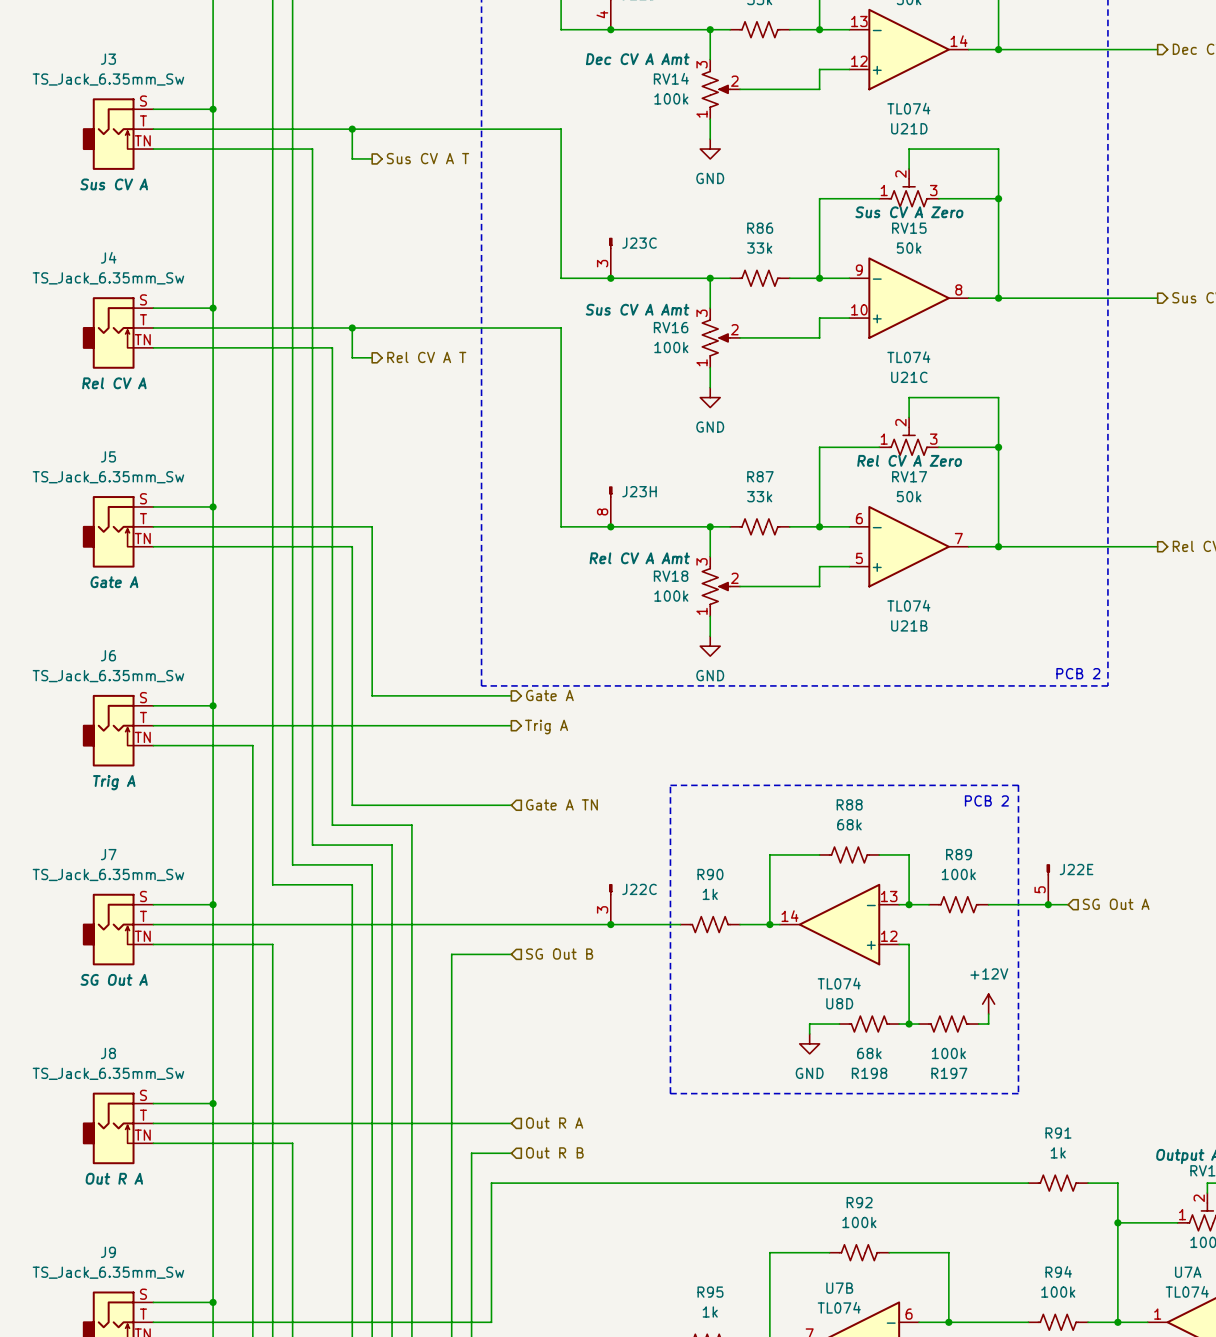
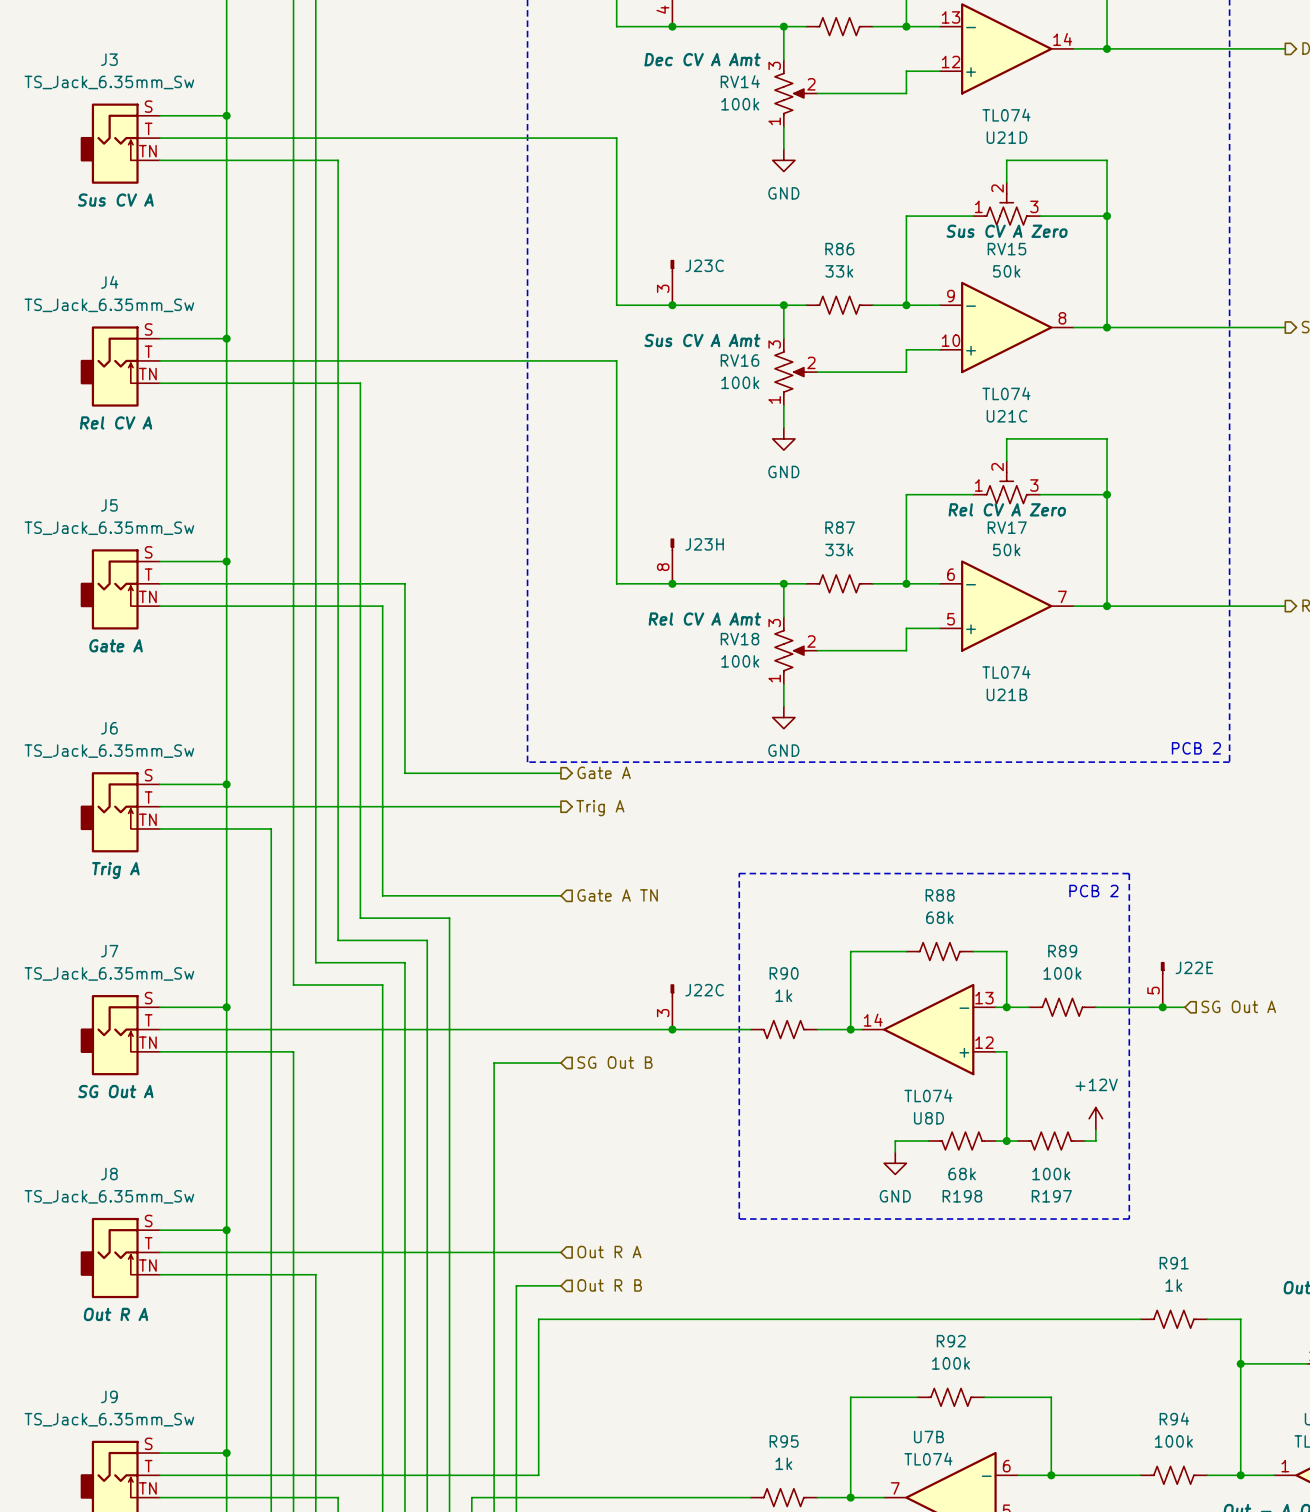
wire: (352, 129) (352, 158) (372, 158) -> none
junction: (352, 129) -> none
hierarchical label: Sus CV A T (427, 158) -> none
wire: (352, 328) (352, 357) (372, 357) -> none
junction: (352, 328) -> none
hierarchical label: Rel CV A T (426, 357) -> none

